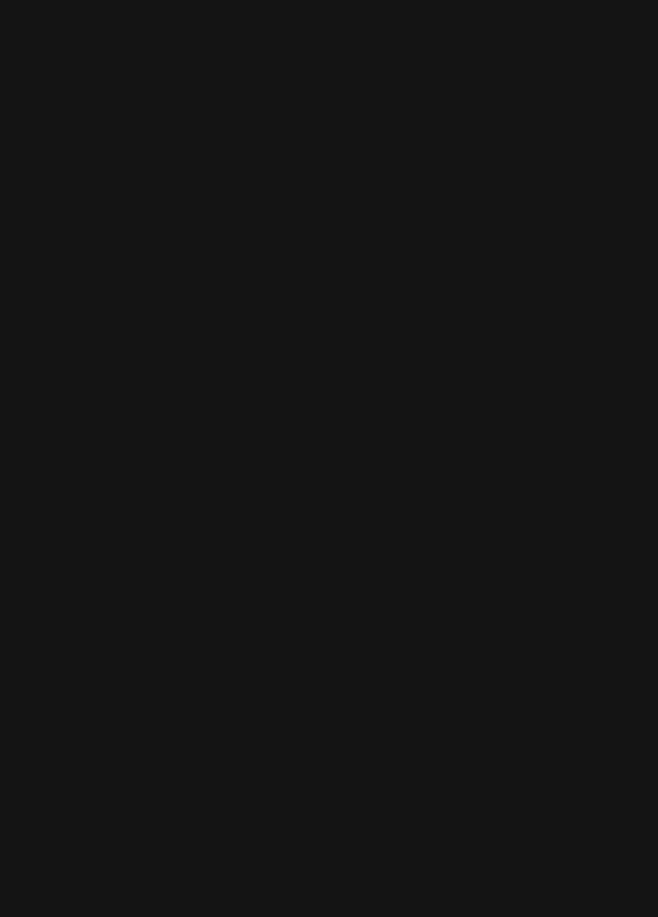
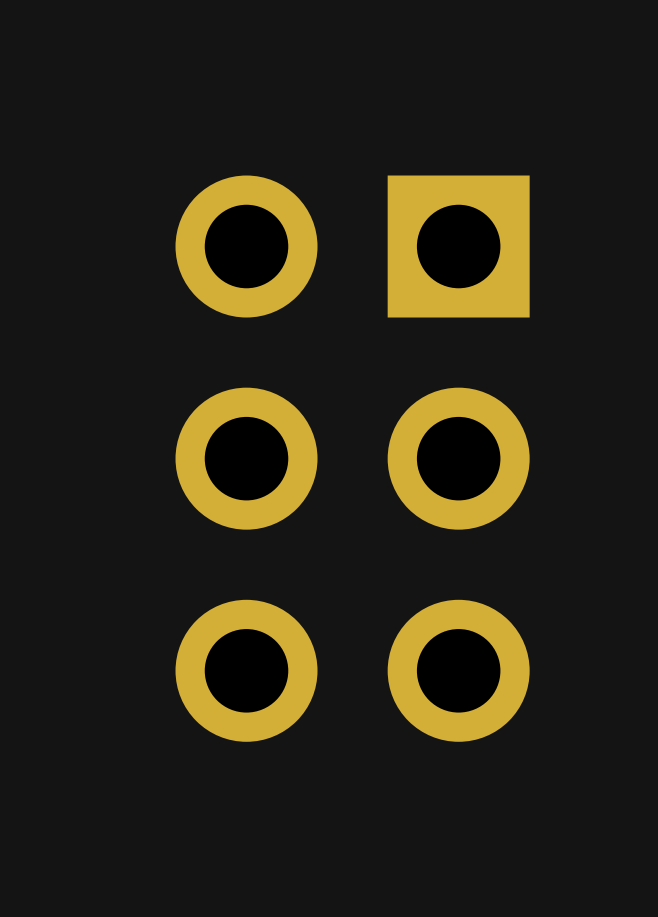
part: none -> (352, 458)

